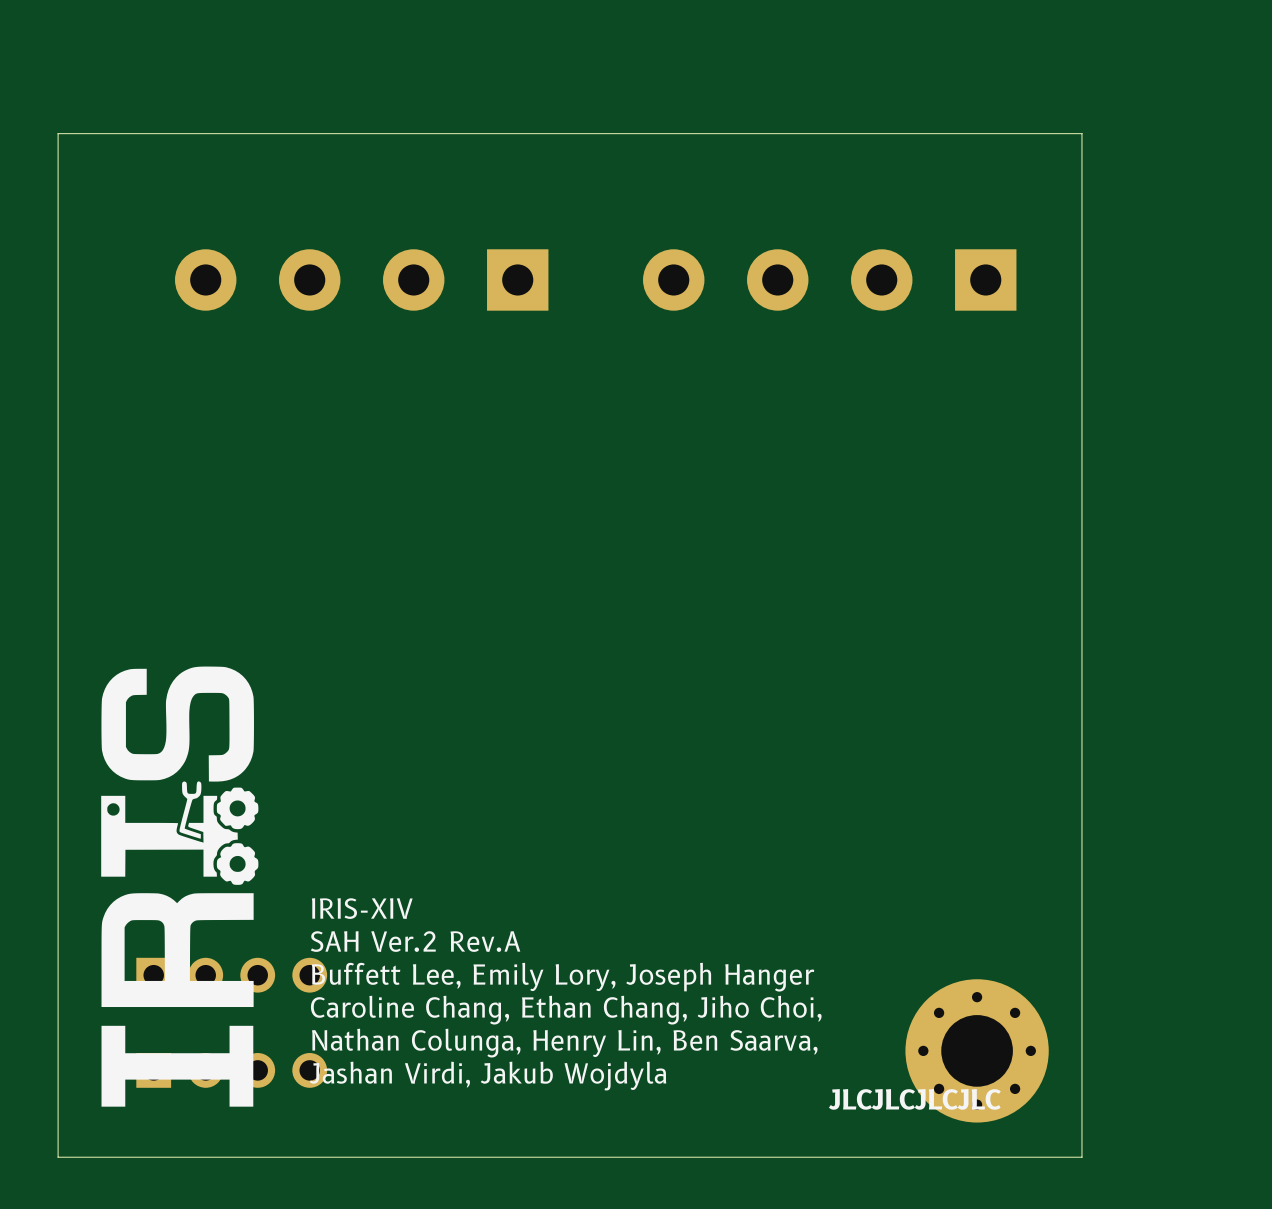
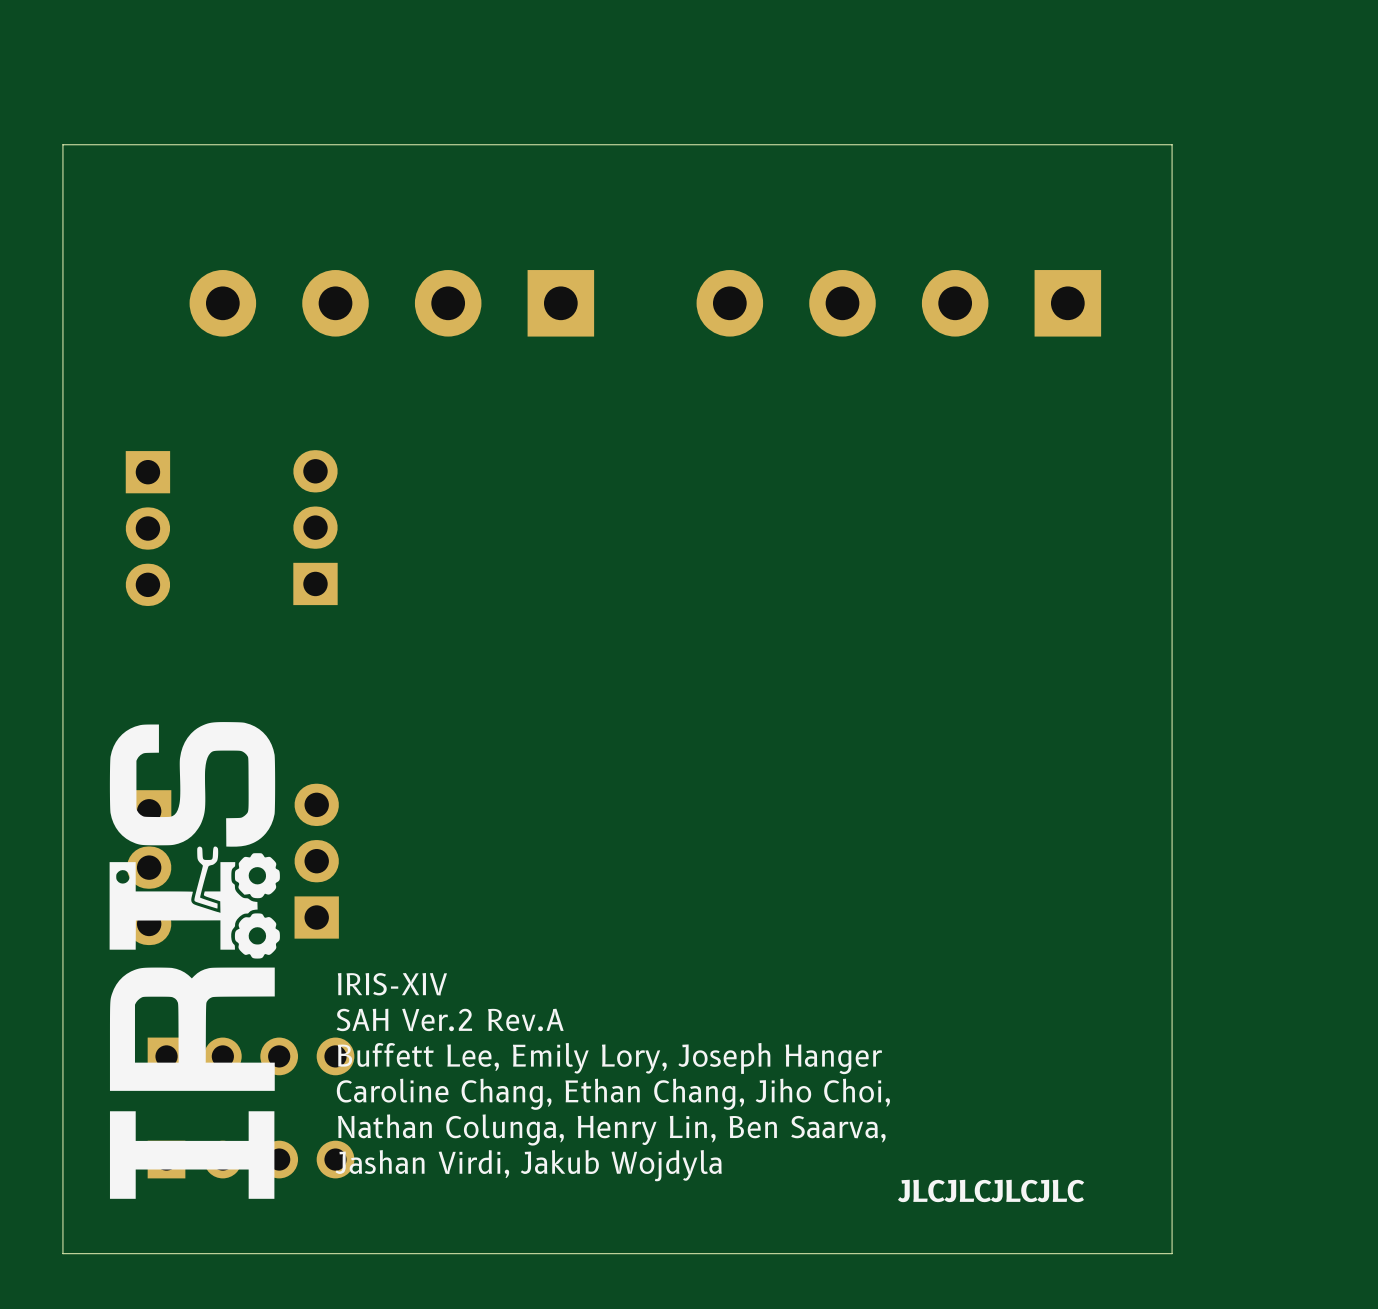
part: none -> (147, 528)
part: none -> (315, 527)
part: none -> (316, 861)
part: none -> (149, 867)
part: (977, 1050) -> none

